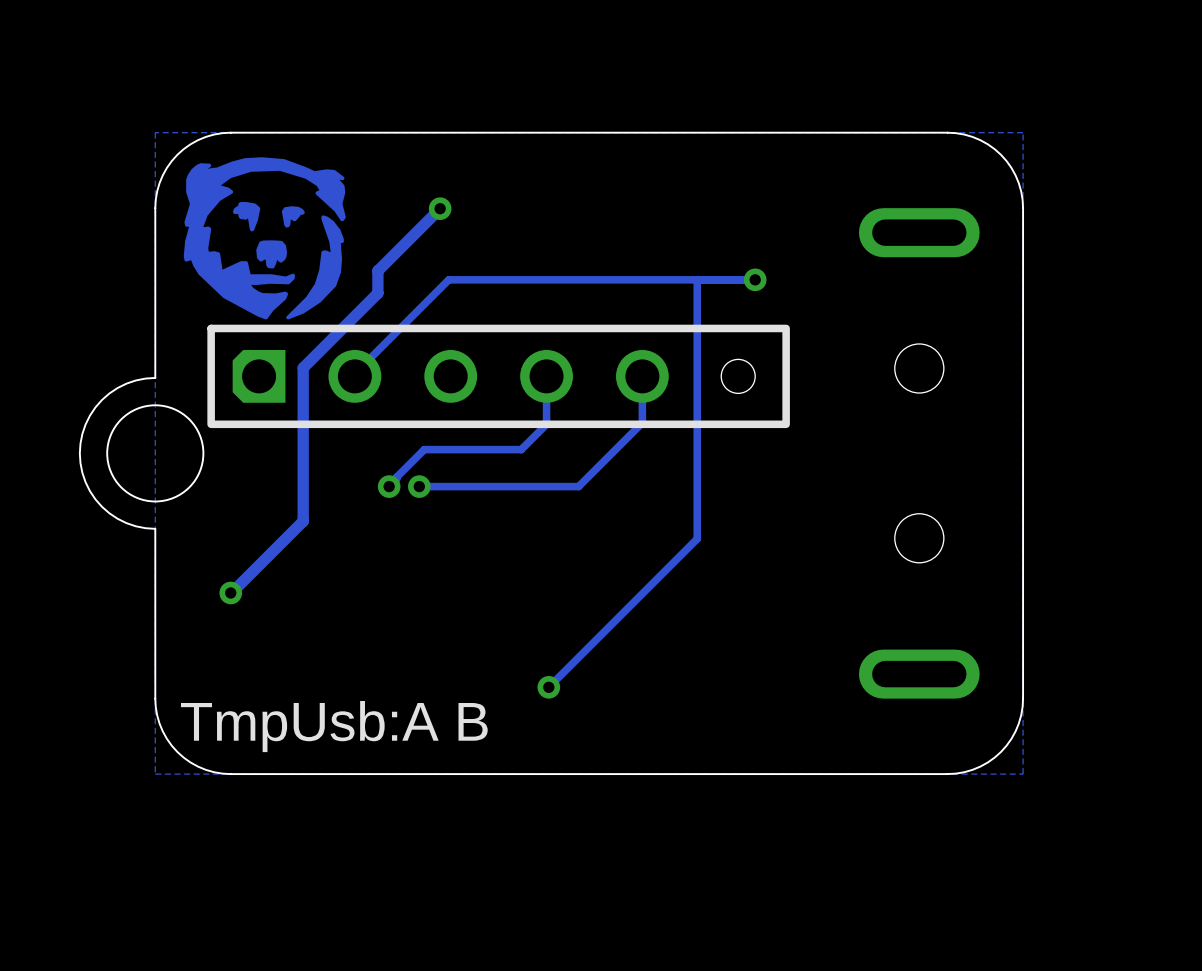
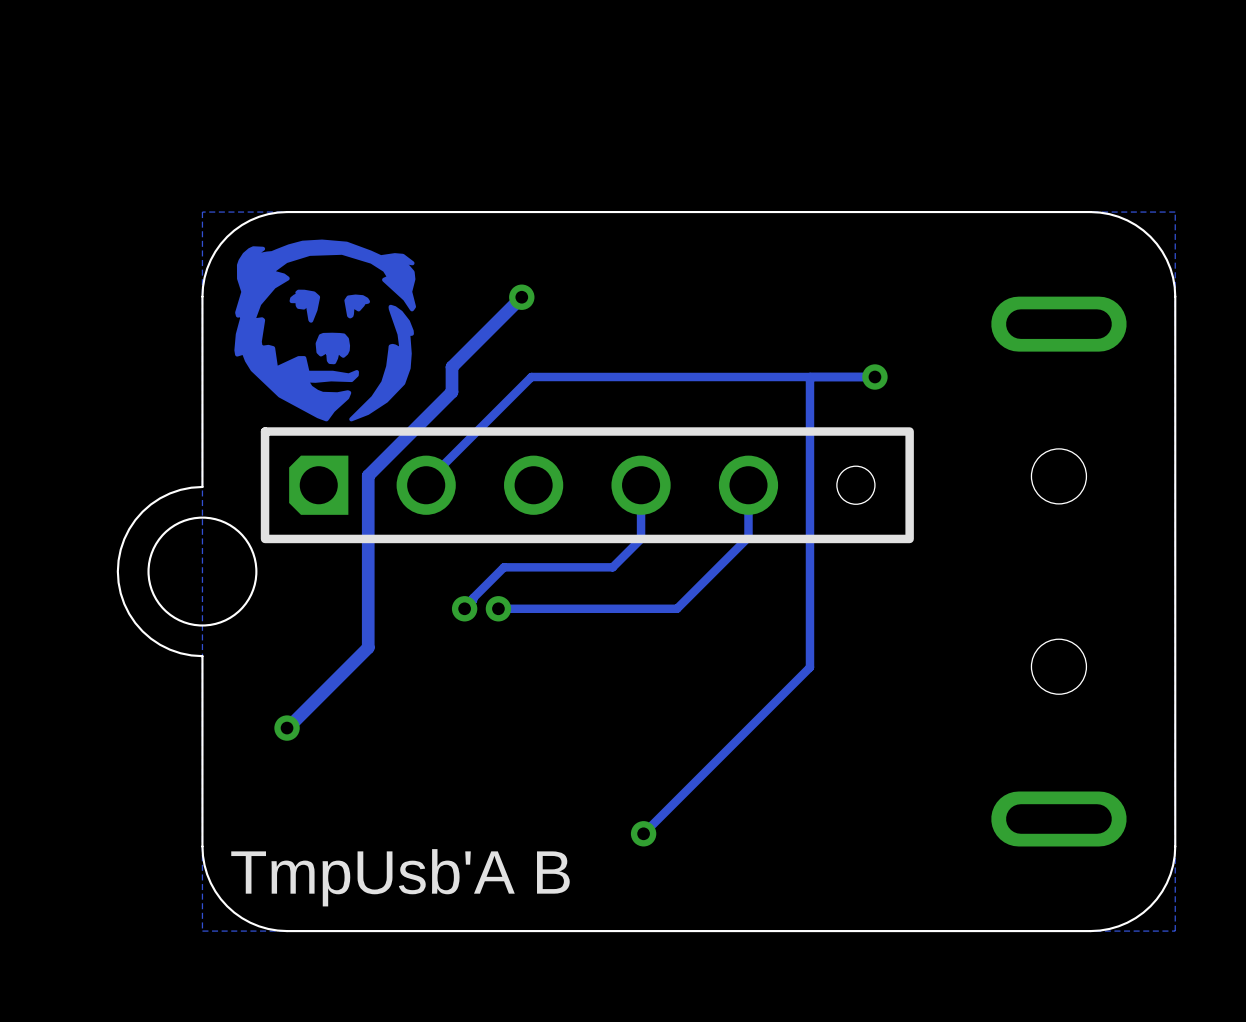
text: TmpUsb:A B (334, 726) -> TmpUsb'A B (400, 877)

